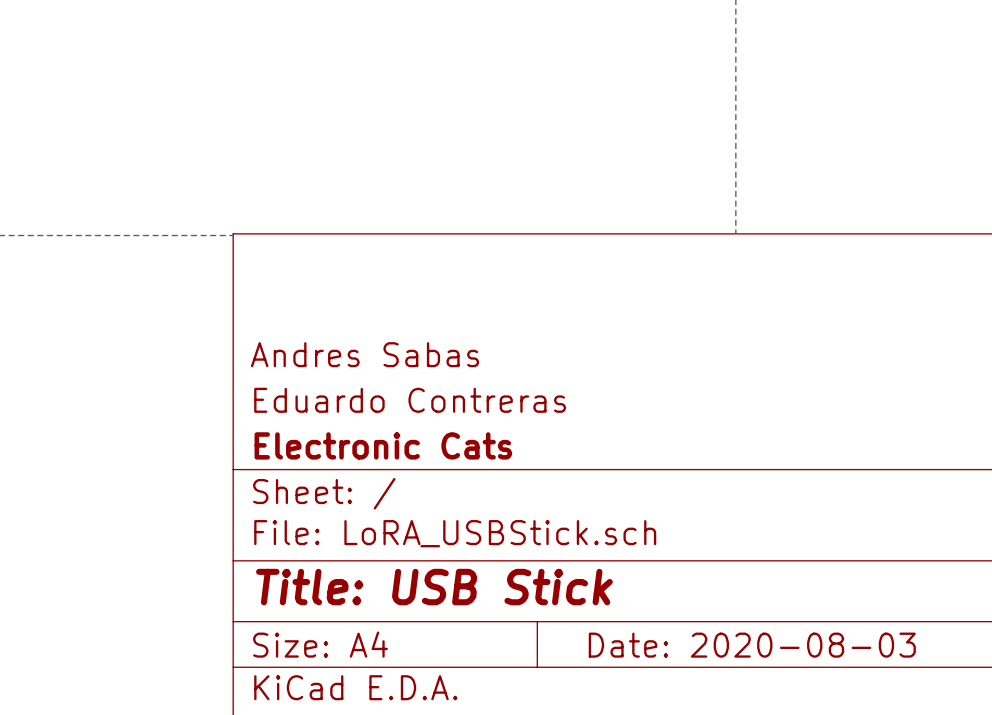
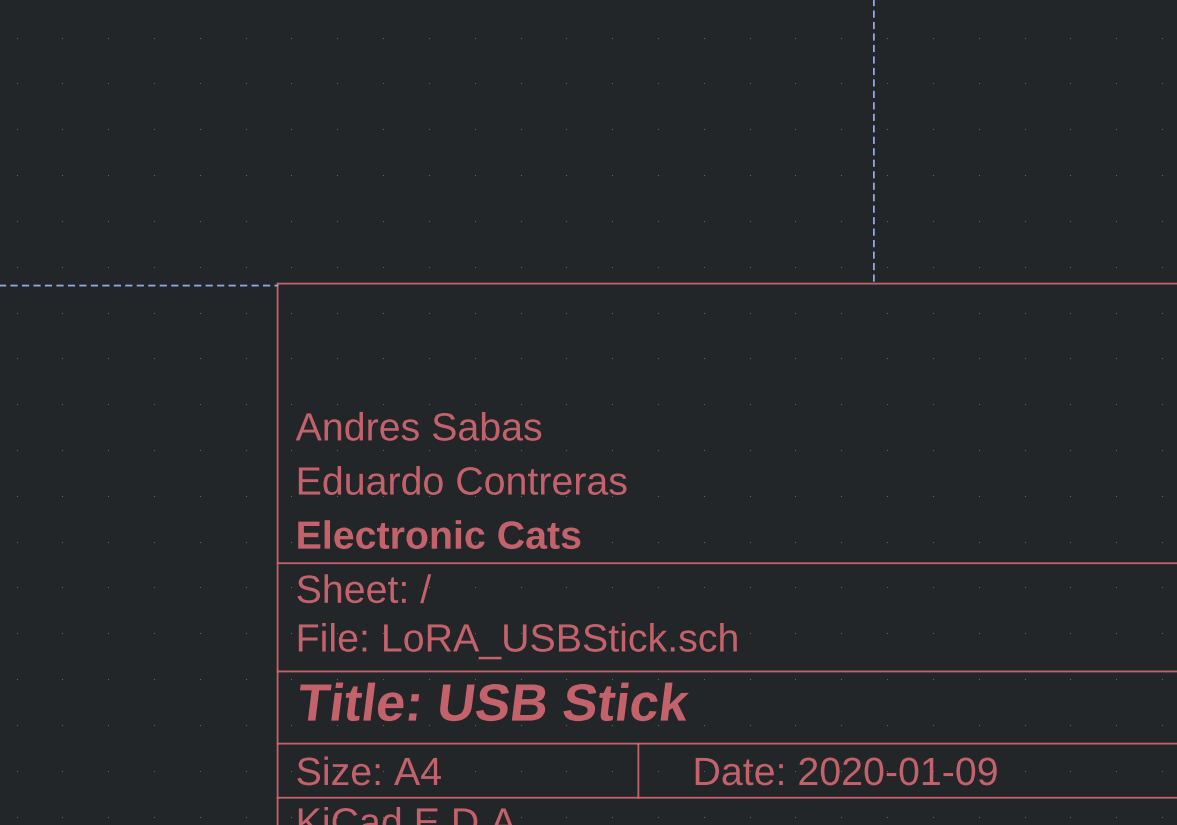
title block: Date: 2020-08-03 (752, 645) -> Date: 2020-01-09 (846, 771)

